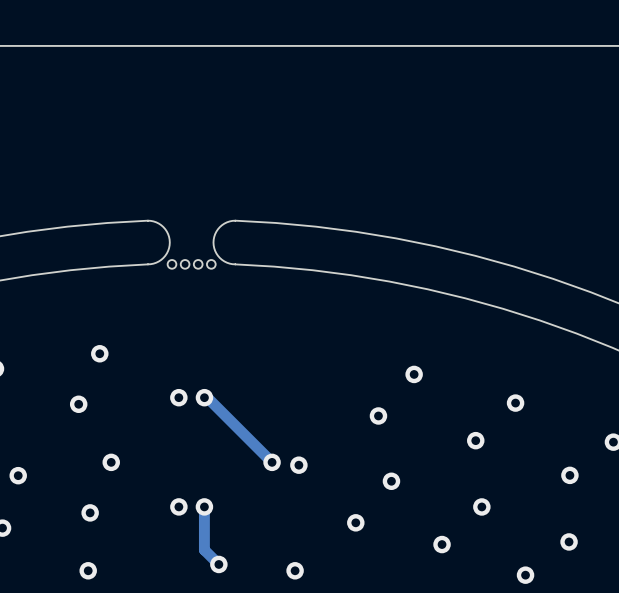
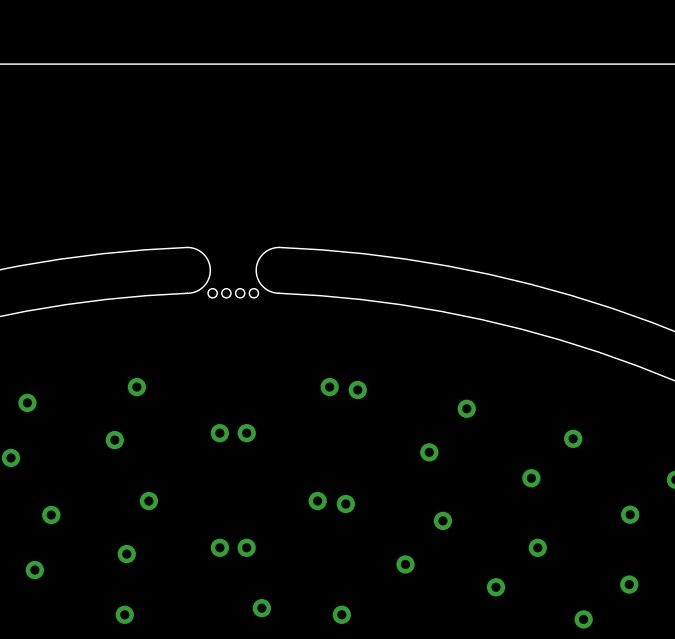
via: none -> (329, 387)
via: none -> (357, 390)
track: (204, 397) (207, 397) (272, 462) -> none
track: (204, 506) (204, 550) (218, 564) -> none

